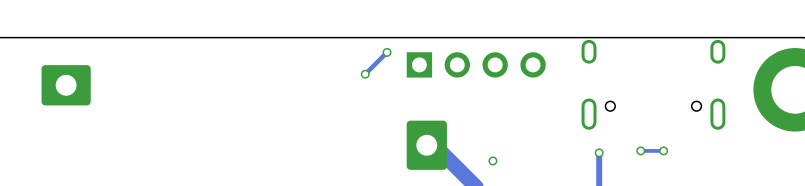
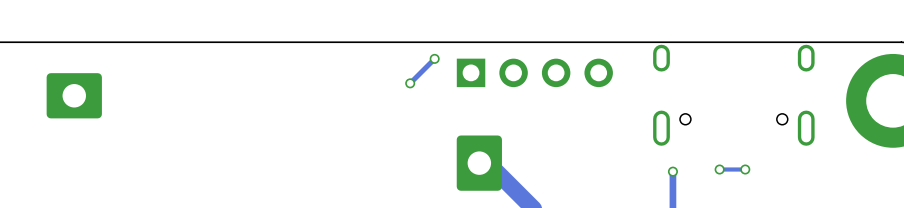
via: (492, 160) -> none

